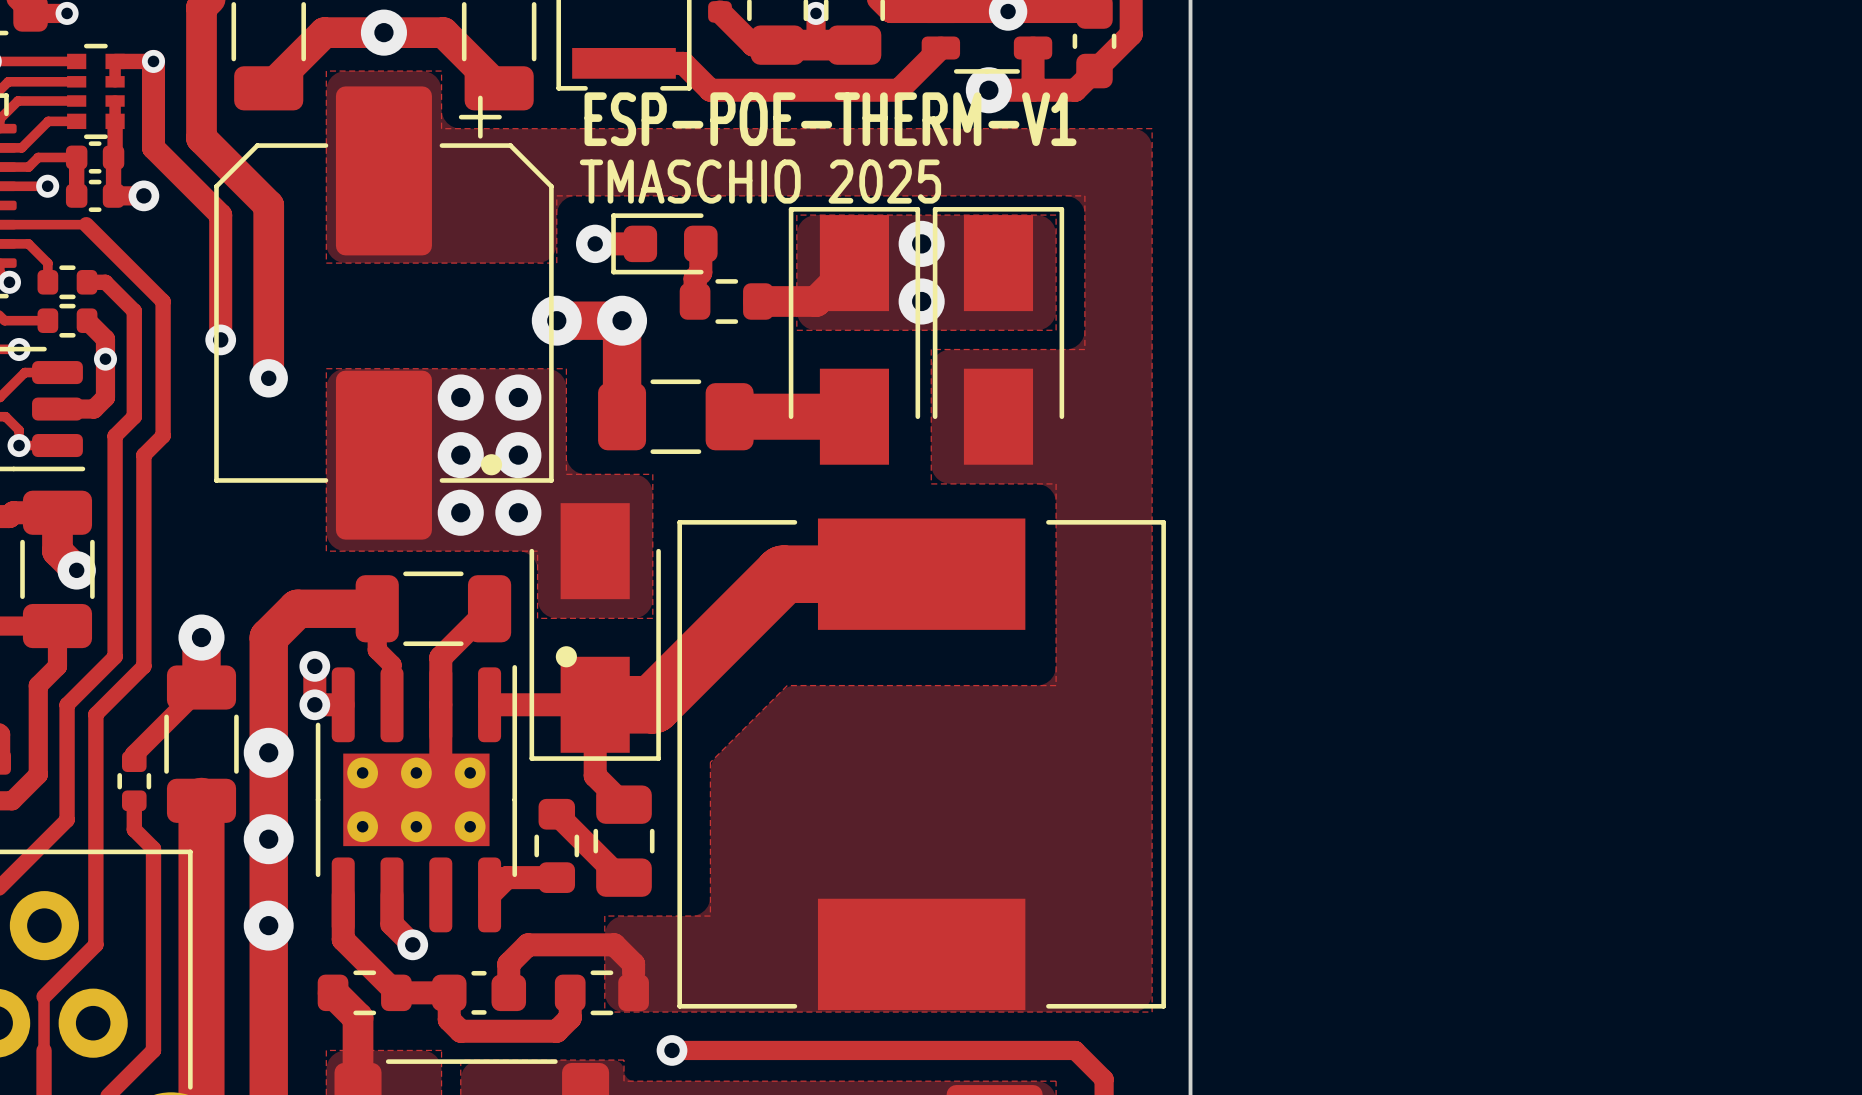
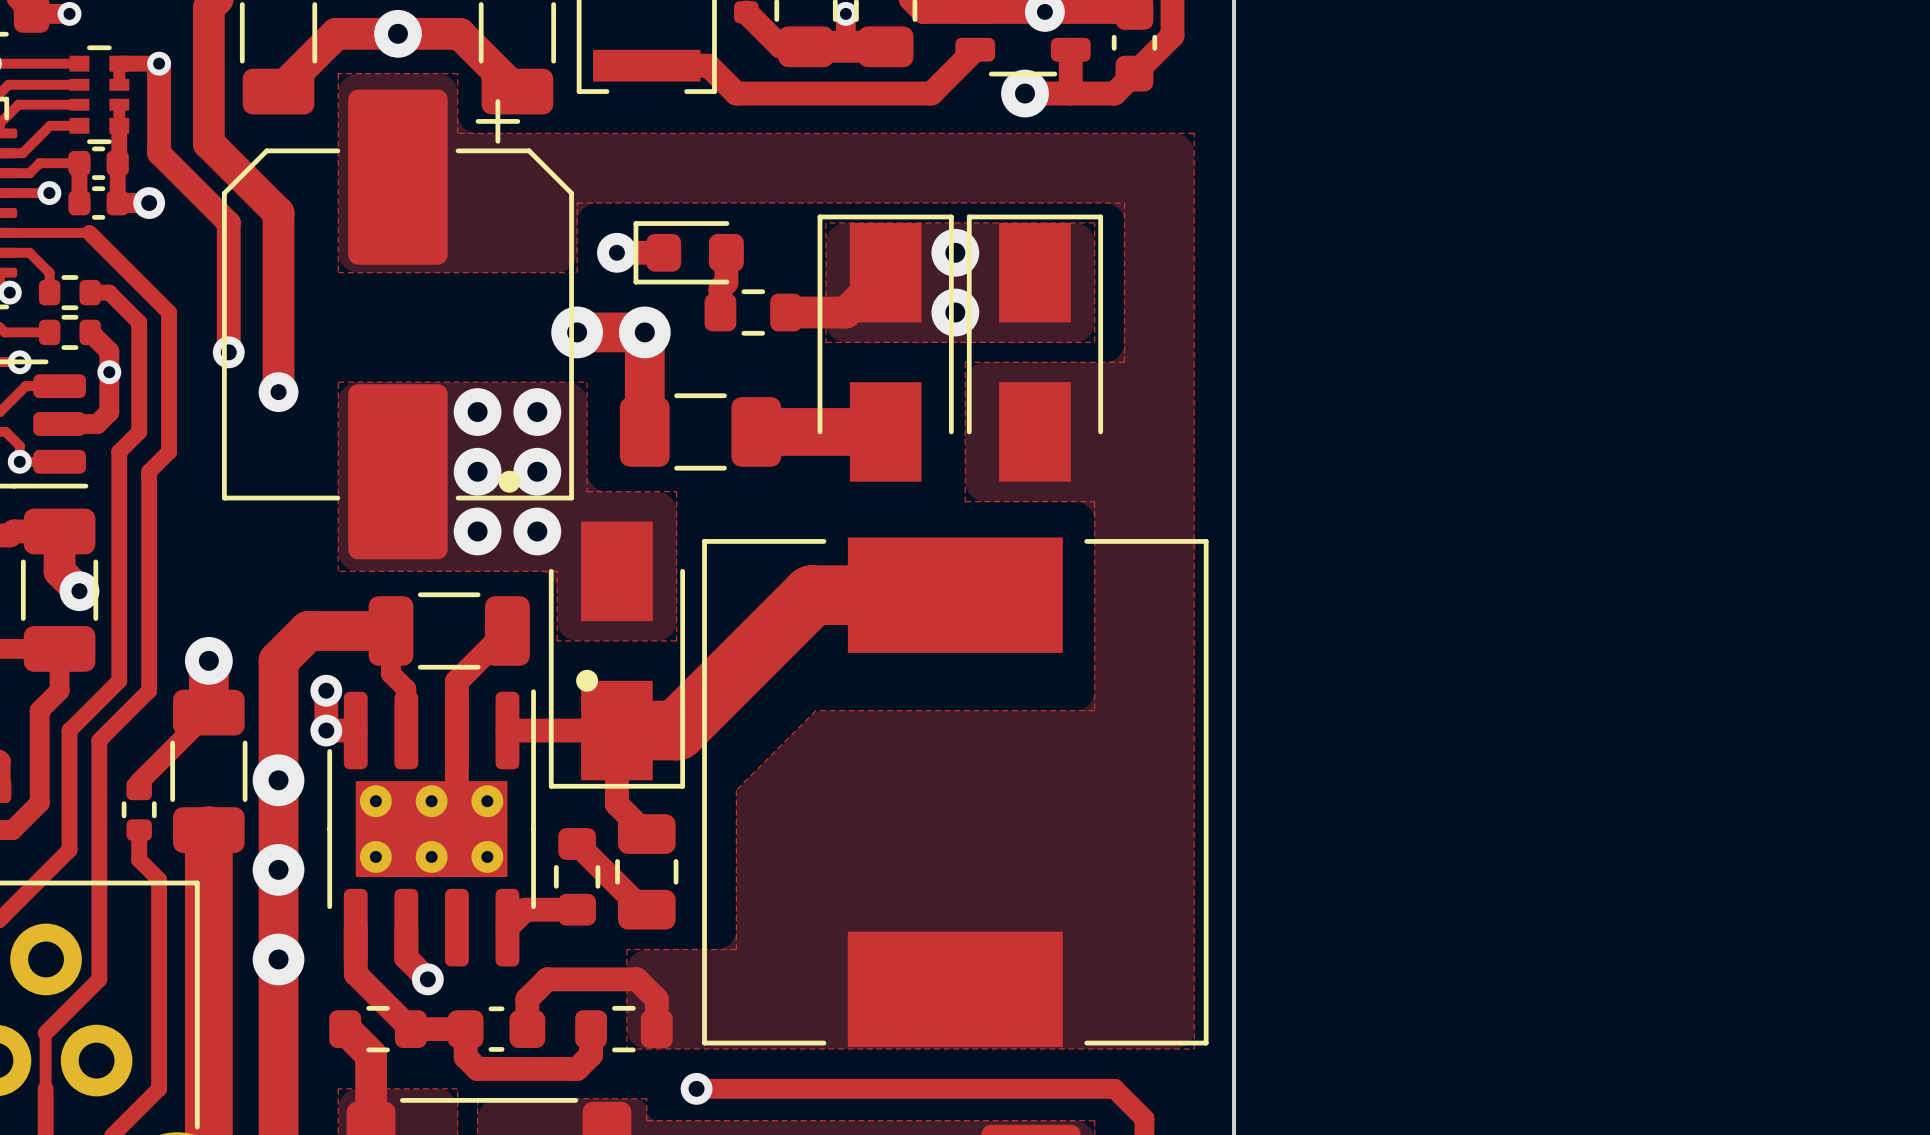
text: ESP-POE-THERM-V1 (830, 119) -> none
text: TMASCHIO 2025 (760, 181) -> none

